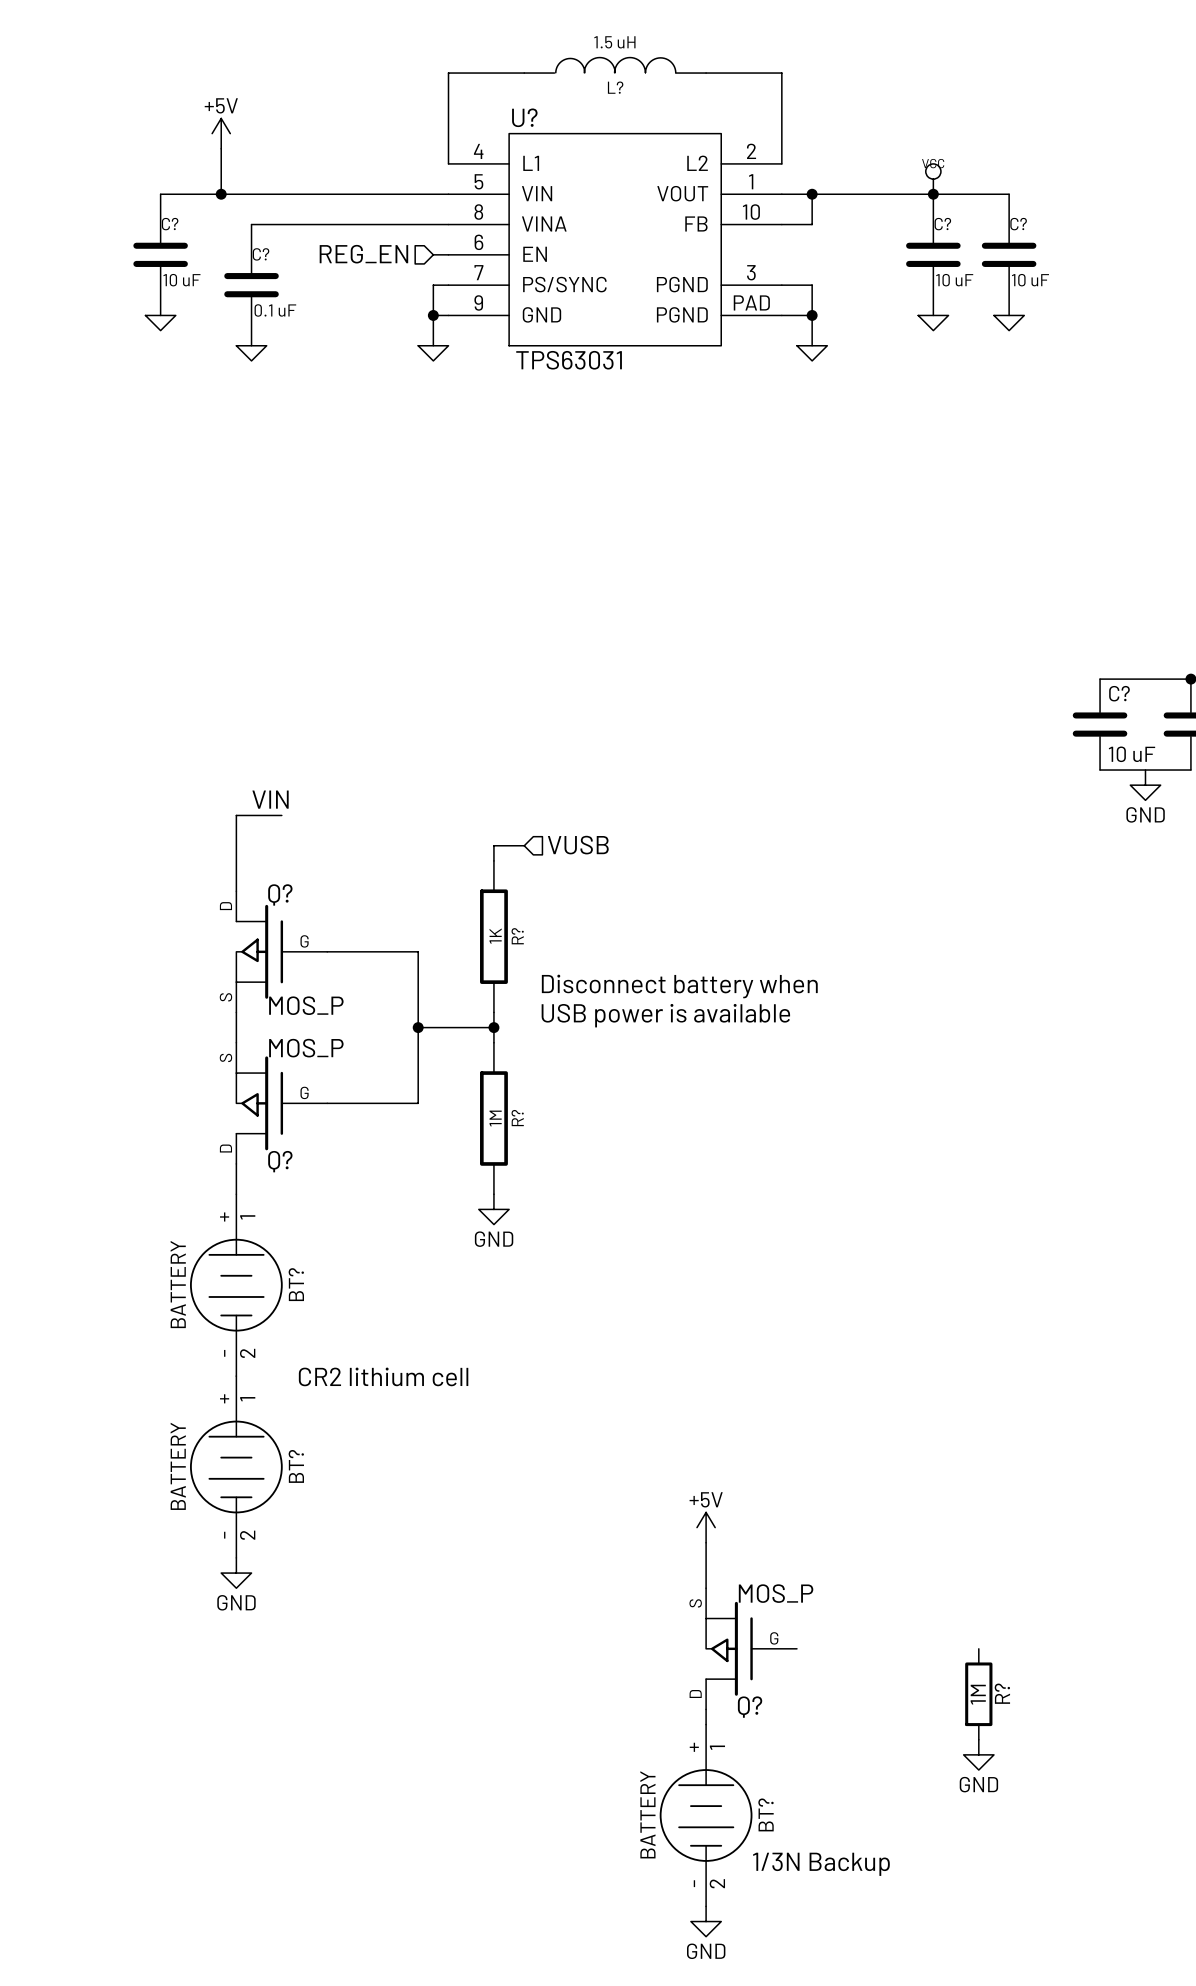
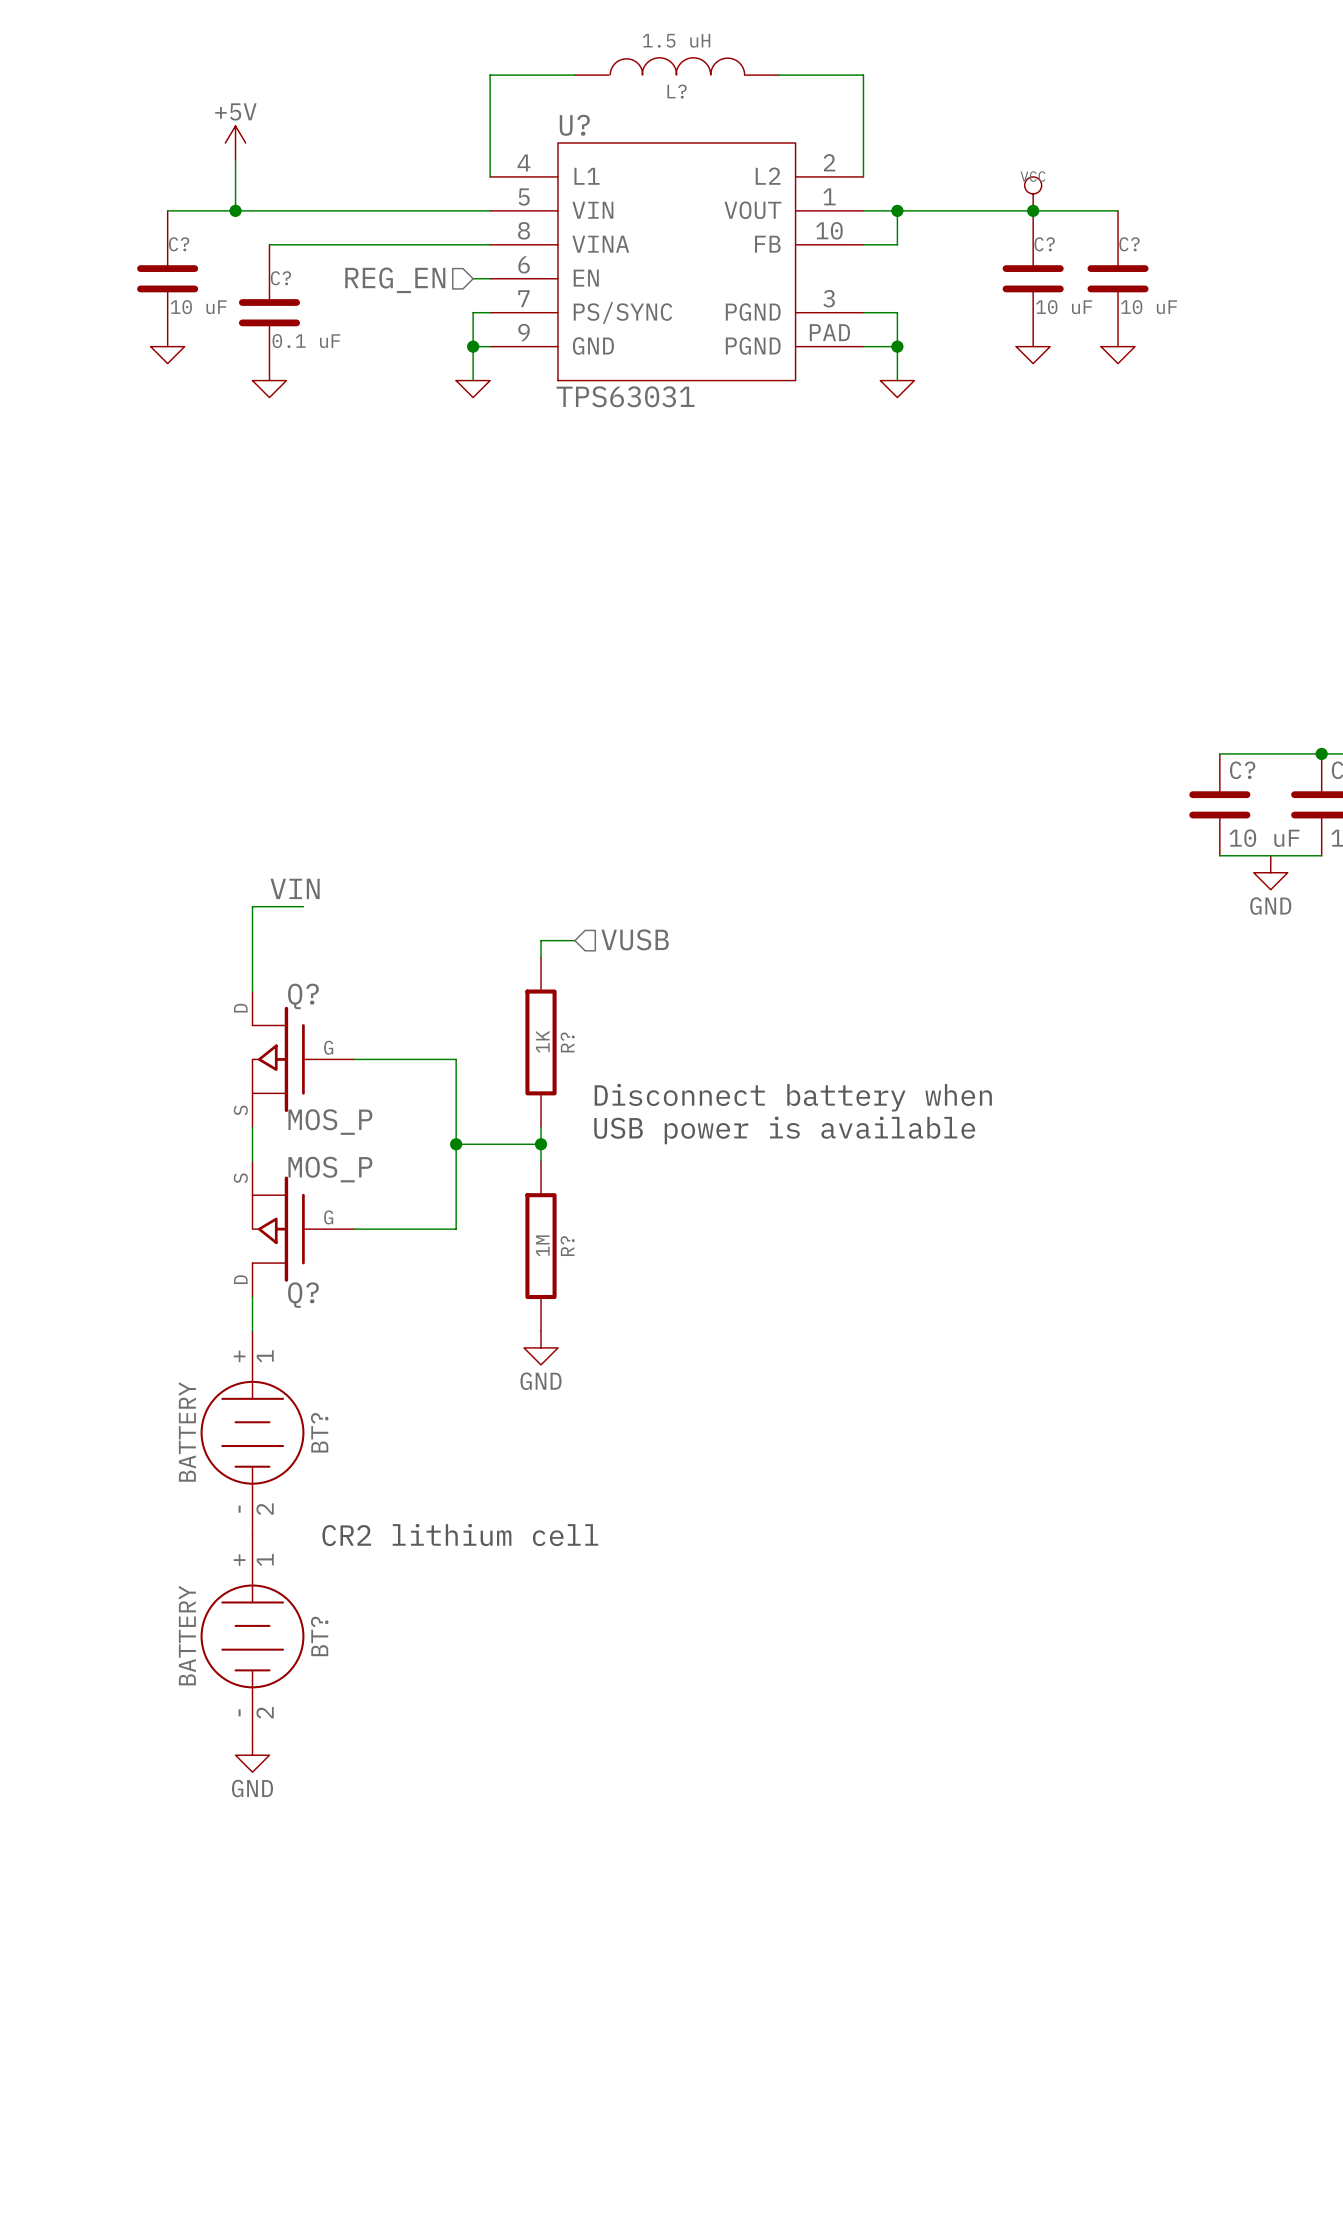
power symbol: +5V (706, 1527) -> none
wire: (706, 1542) (706, 1588) -> none
Q?: MOS_P (751, 1648) -> none
R?: 1M (978, 1694) -> none
wire: (706, 1709) (706, 1724) -> none
power symbol: GND (978, 1754) -> none
BT?: BATTERY (706, 1815) -> none
text: 1/3N Backup (821, 1864) -> none
power symbol: GND (706, 1921) -> none

